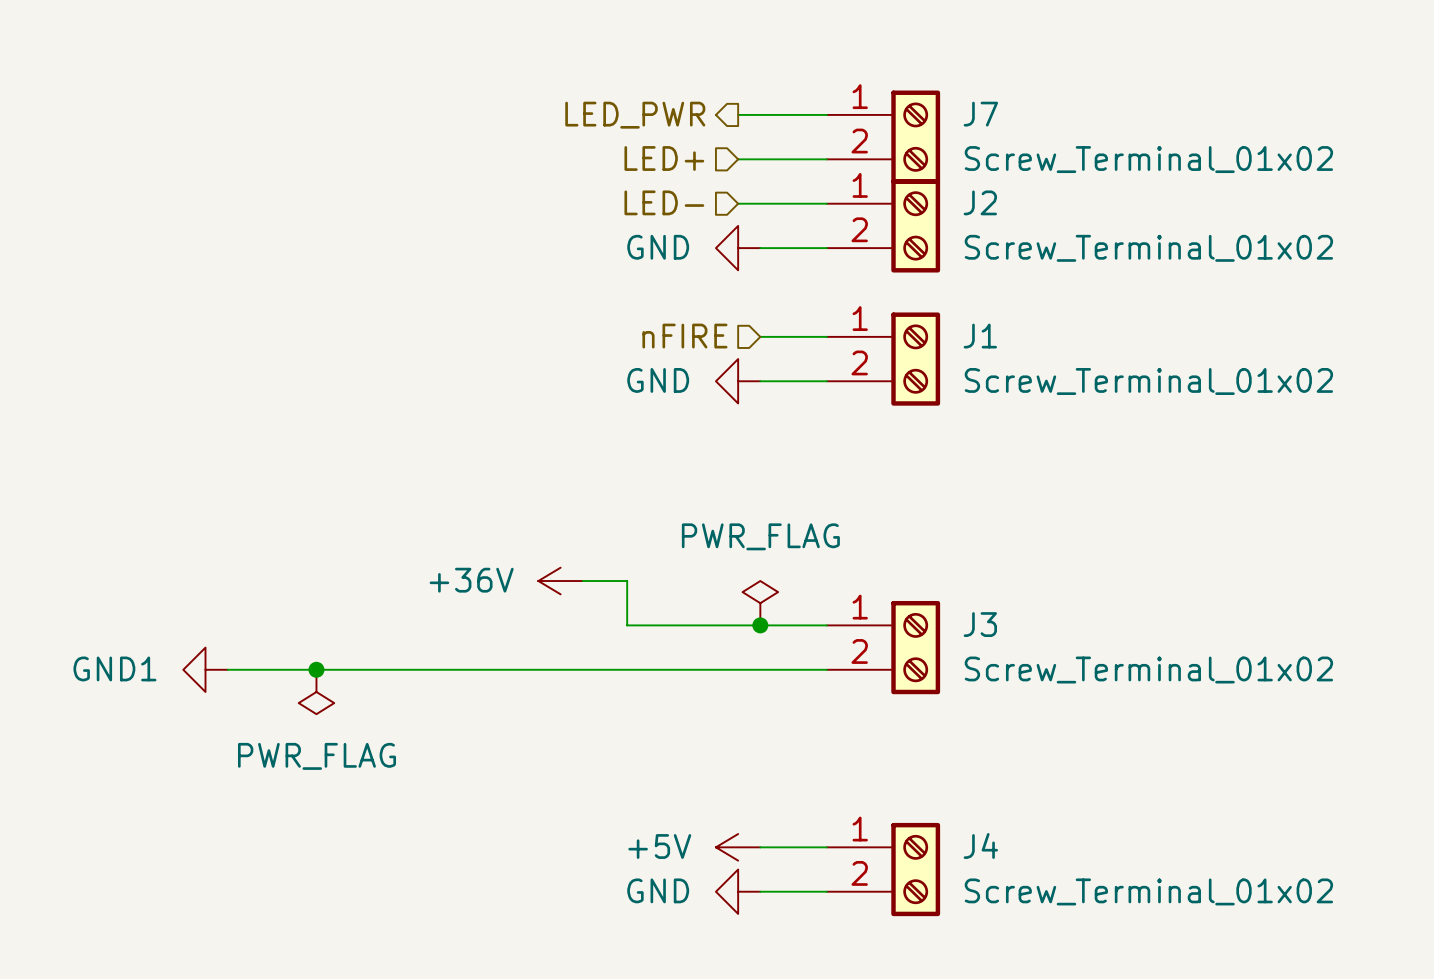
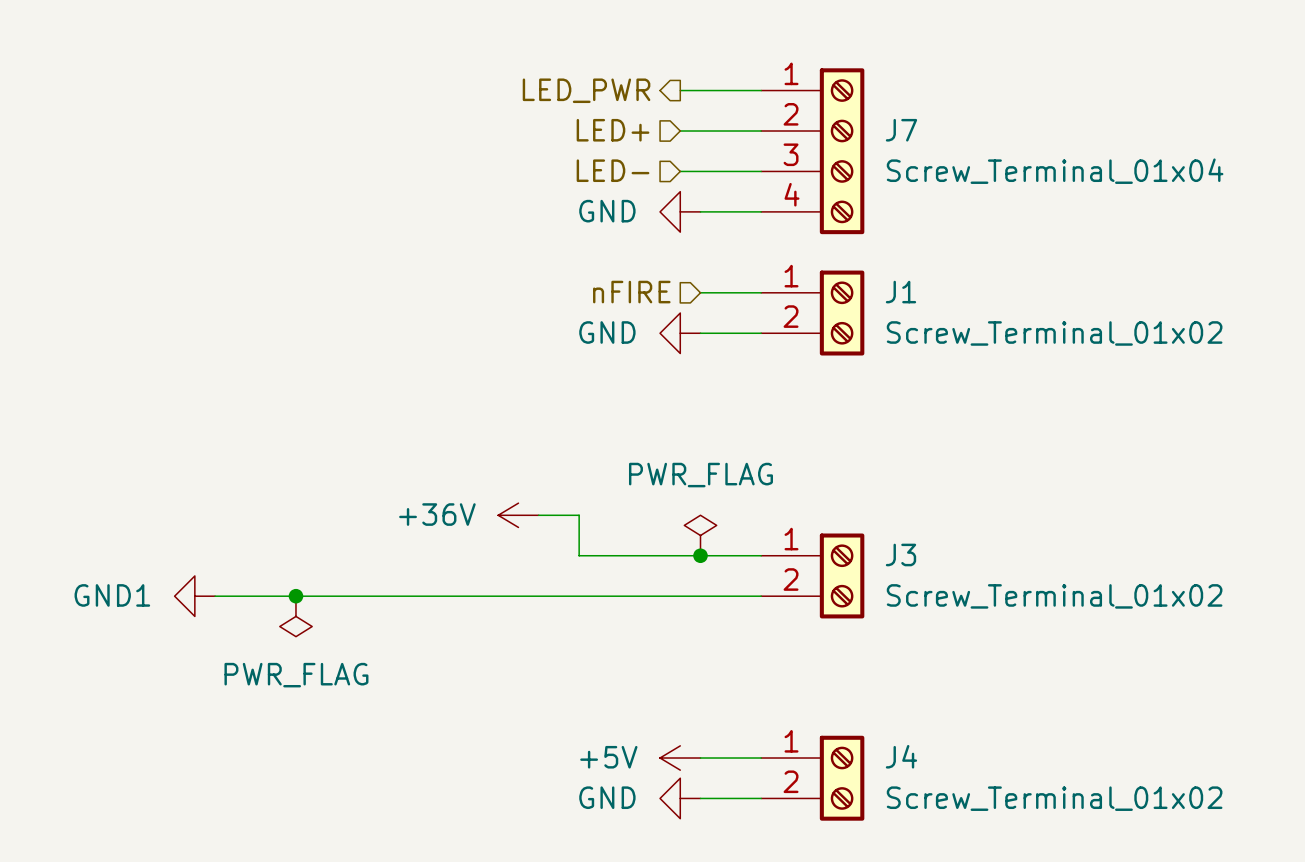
J7 symbol: [826, 90, 941, 184] -> [761, 68, 865, 235]
J7 value: Screw_Terminal_01x02 (1148, 159) -> Screw_Terminal_01x04 (1055, 171)
J2: Screw_Terminal_01x02 (883, 225) -> none

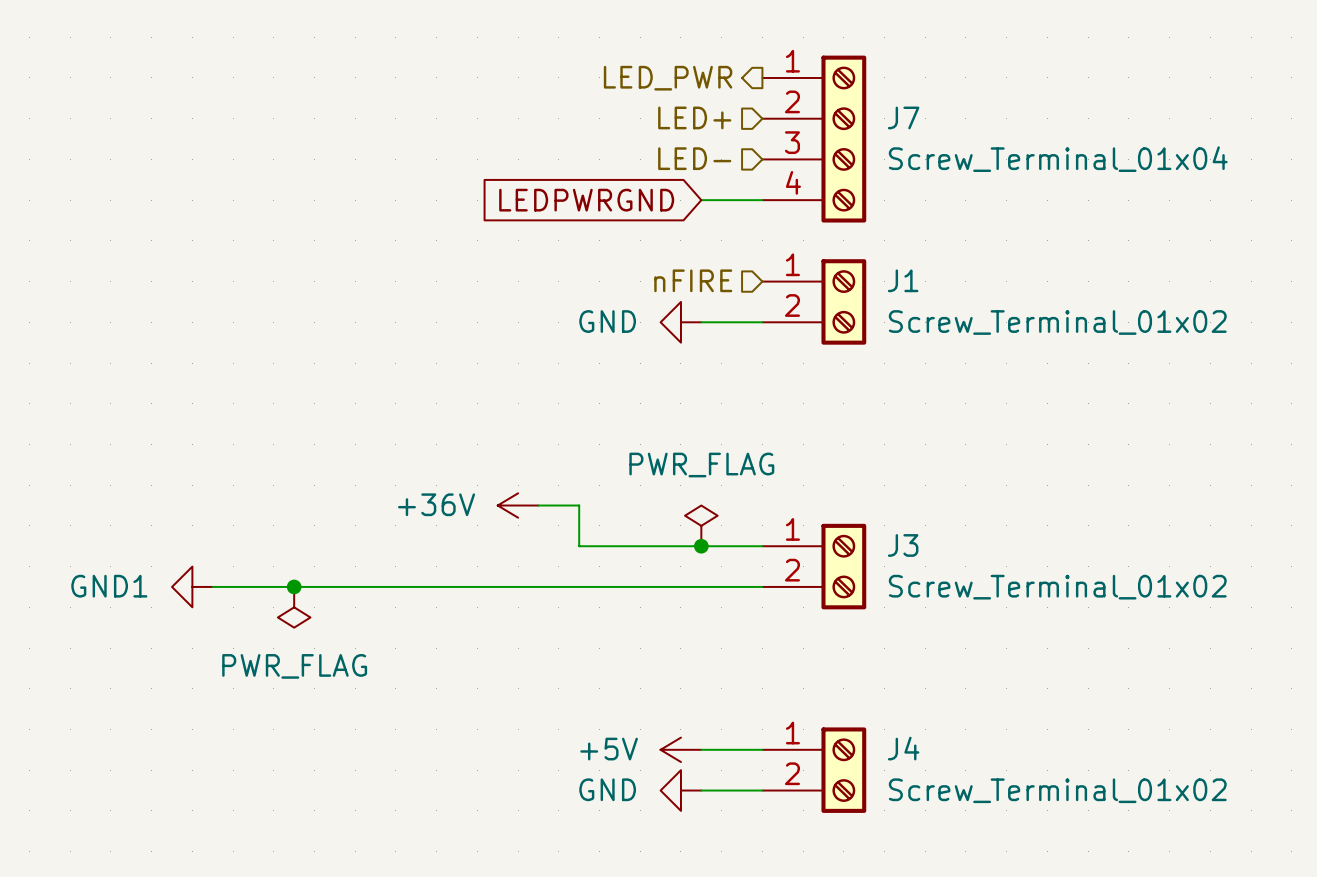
hierarchical label position: LED_PWR (586, 90) -> LED_PWR (668, 78)
wire: (680, 90) (761, 90) -> none
hierarchical label position: LED+ (613, 130) -> LED+ (694, 117)
wire: (680, 131) (761, 131) -> none
hierarchical label position: LED- (613, 170) -> LED- (694, 158)
wire: (680, 171) (761, 171) -> none
global label: none -> LEDPWRGND (586, 200)
power symbol: GND (680, 211) -> none
hierarchical label position: nFIRE (631, 292) -> nFIRE (693, 280)
wire: (700, 292) (761, 292) -> none

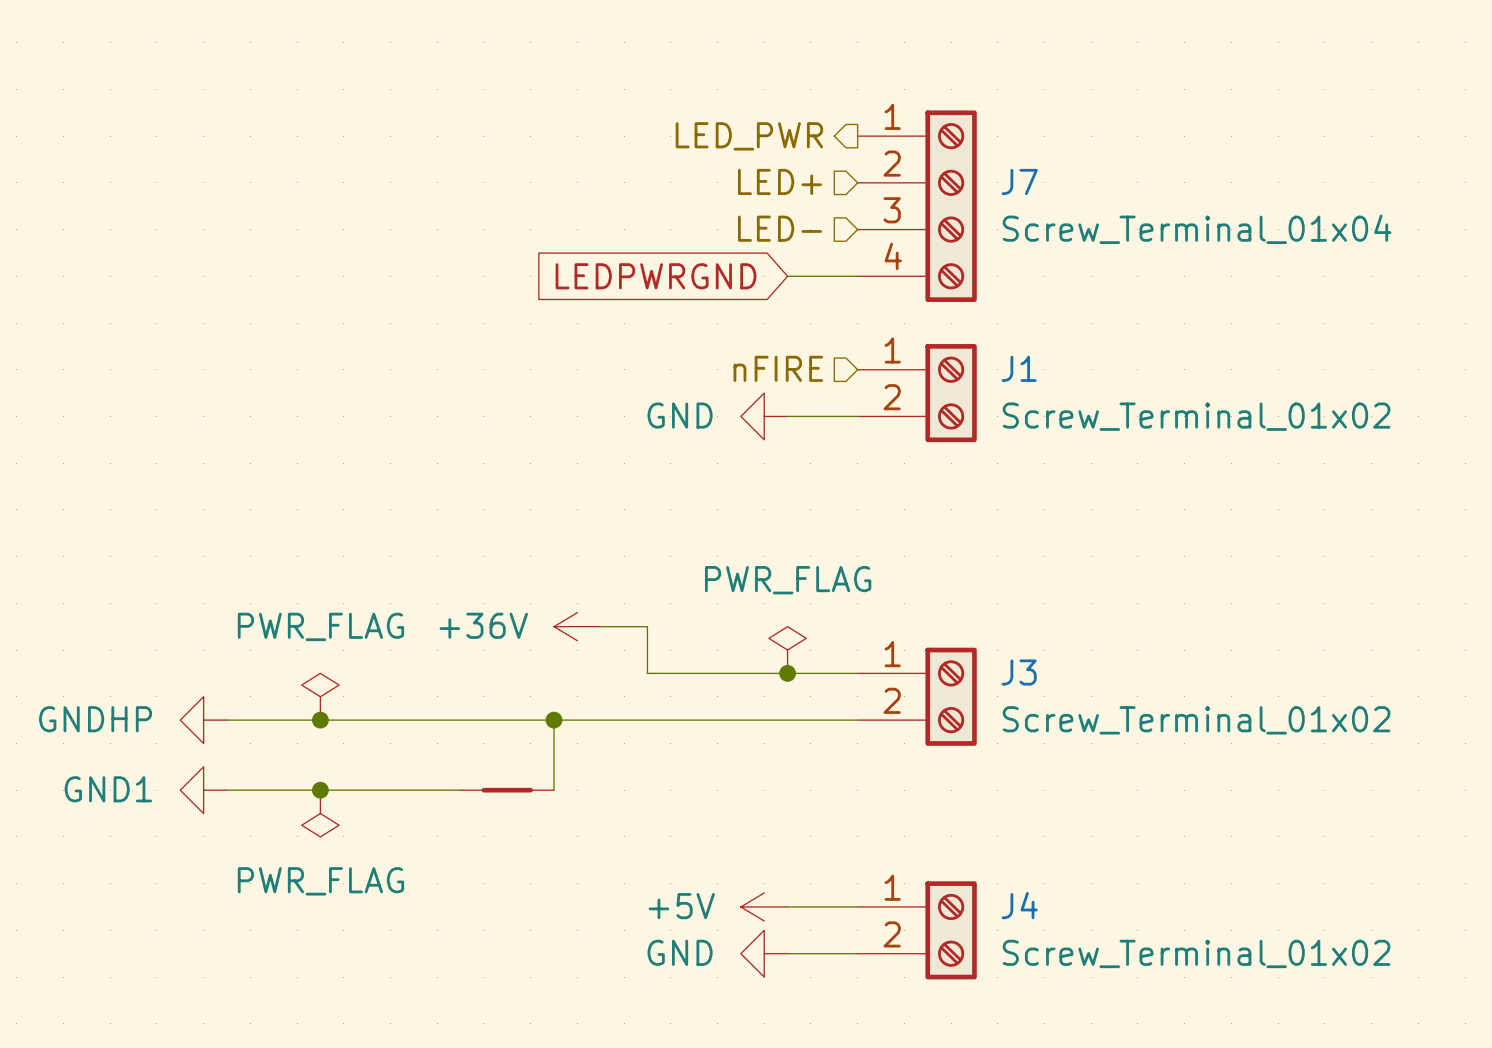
power symbol: none -> PWR_FLAG (320, 696)
power symbol: GND1 (192, 586) -> GNDHP (203, 720)
wire: none -> (554, 720) (554, 790)
junction: none -> (554, 720)
power symbol: PWR_FLAG (294, 607) -> none
power symbol: none -> GND1 (203, 790)
wire: none -> (226, 790) (460, 790)
junction: none -> (320, 790)
part: none -> (507, 790)
power symbol: none -> PWR_FLAG (320, 813)

